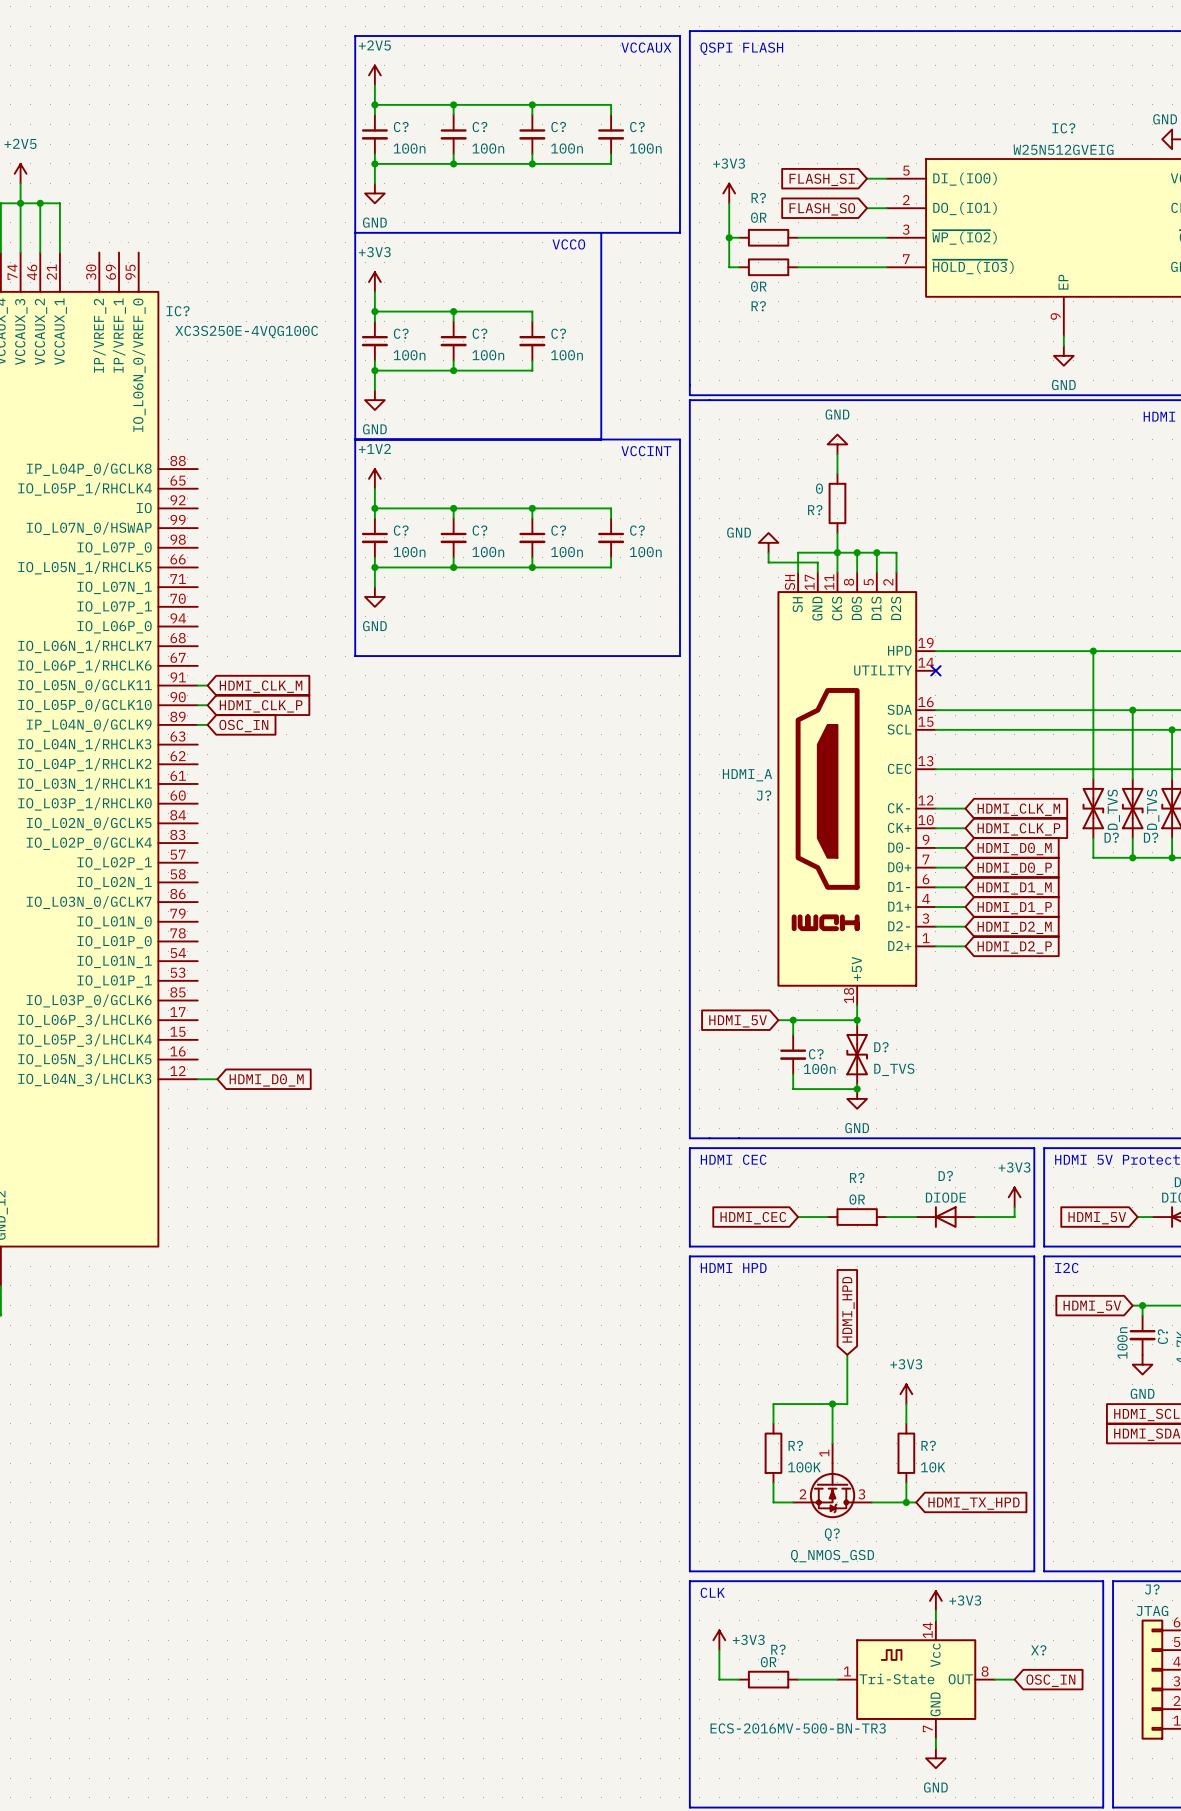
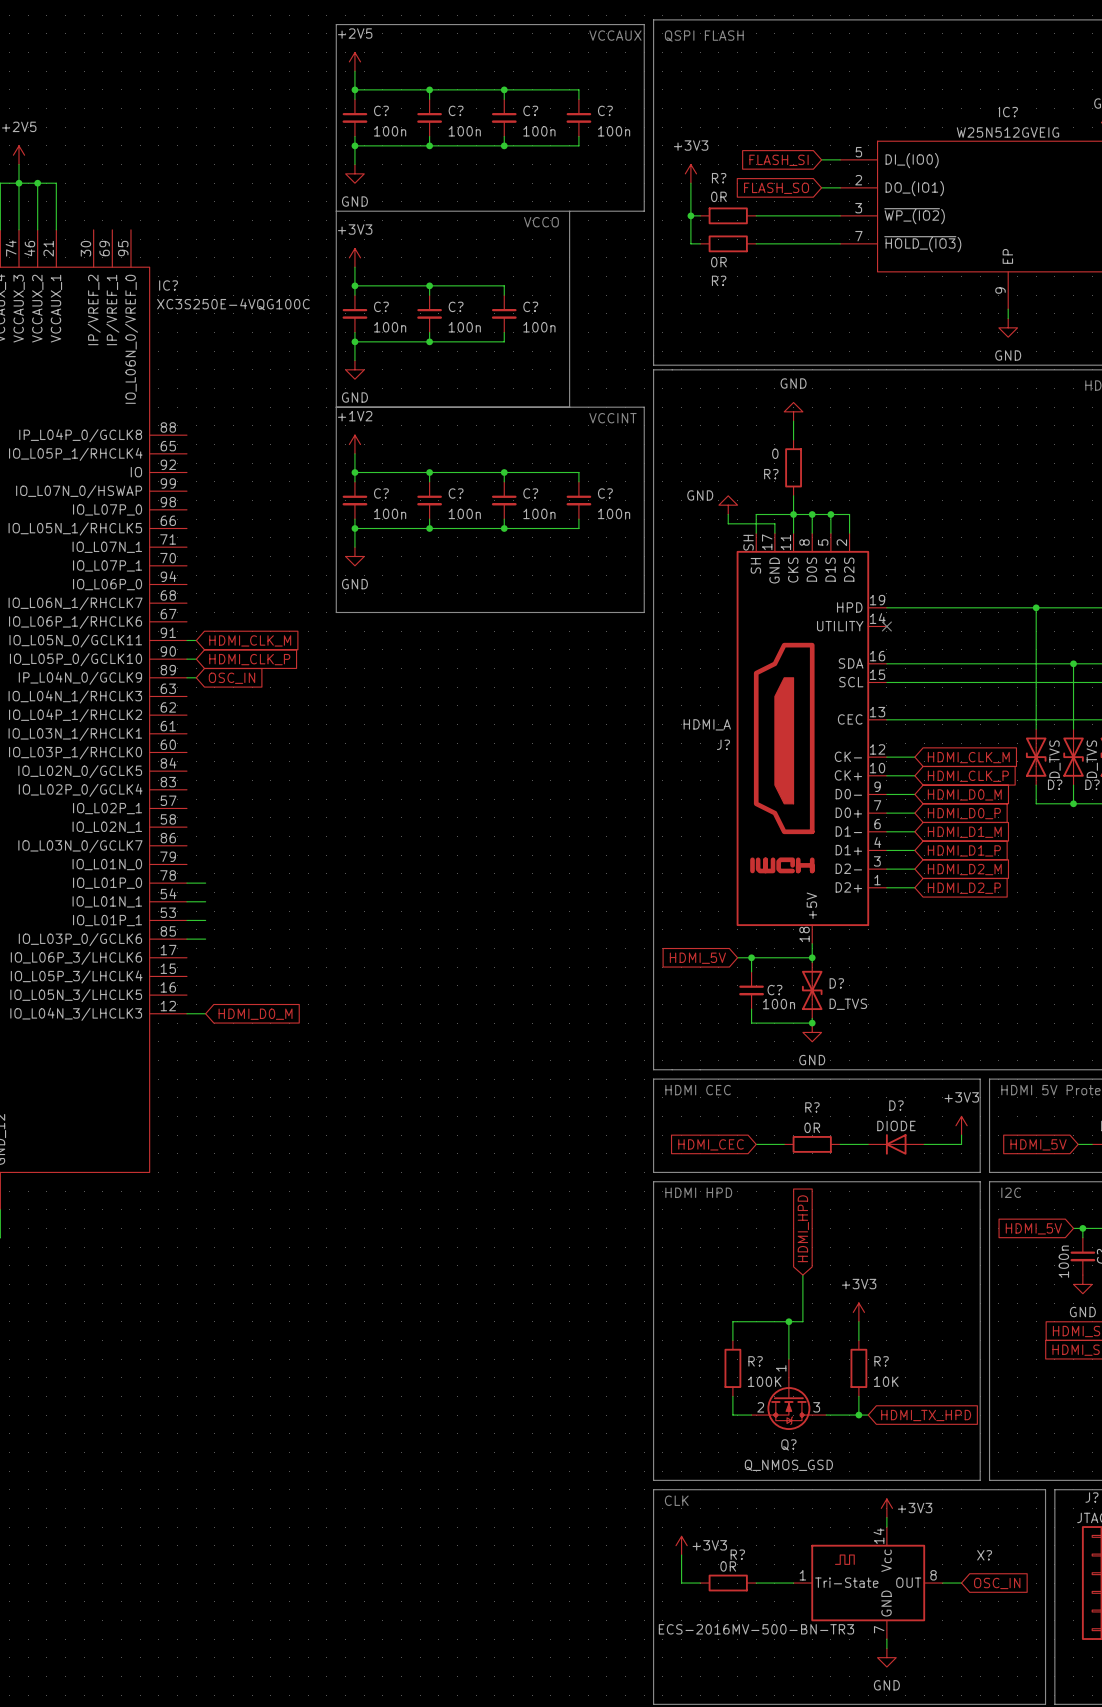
wire: none -> (186, 883) (205, 883)
wire: none -> (186, 901) (205, 901)
wire: none -> (186, 920) (205, 920)
wire: none -> (186, 939) (205, 939)

